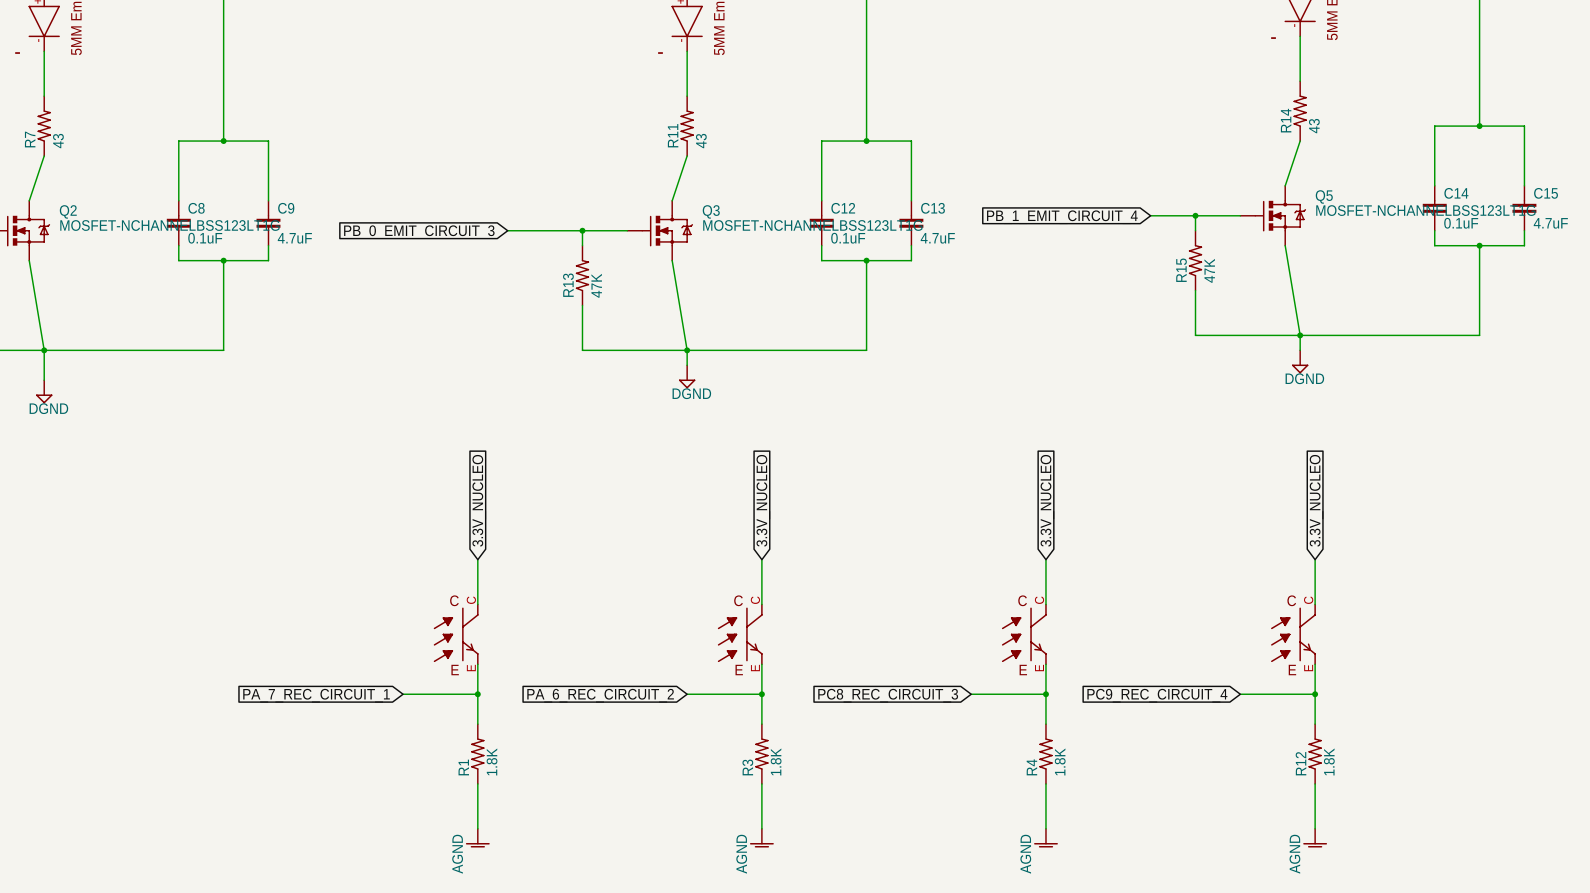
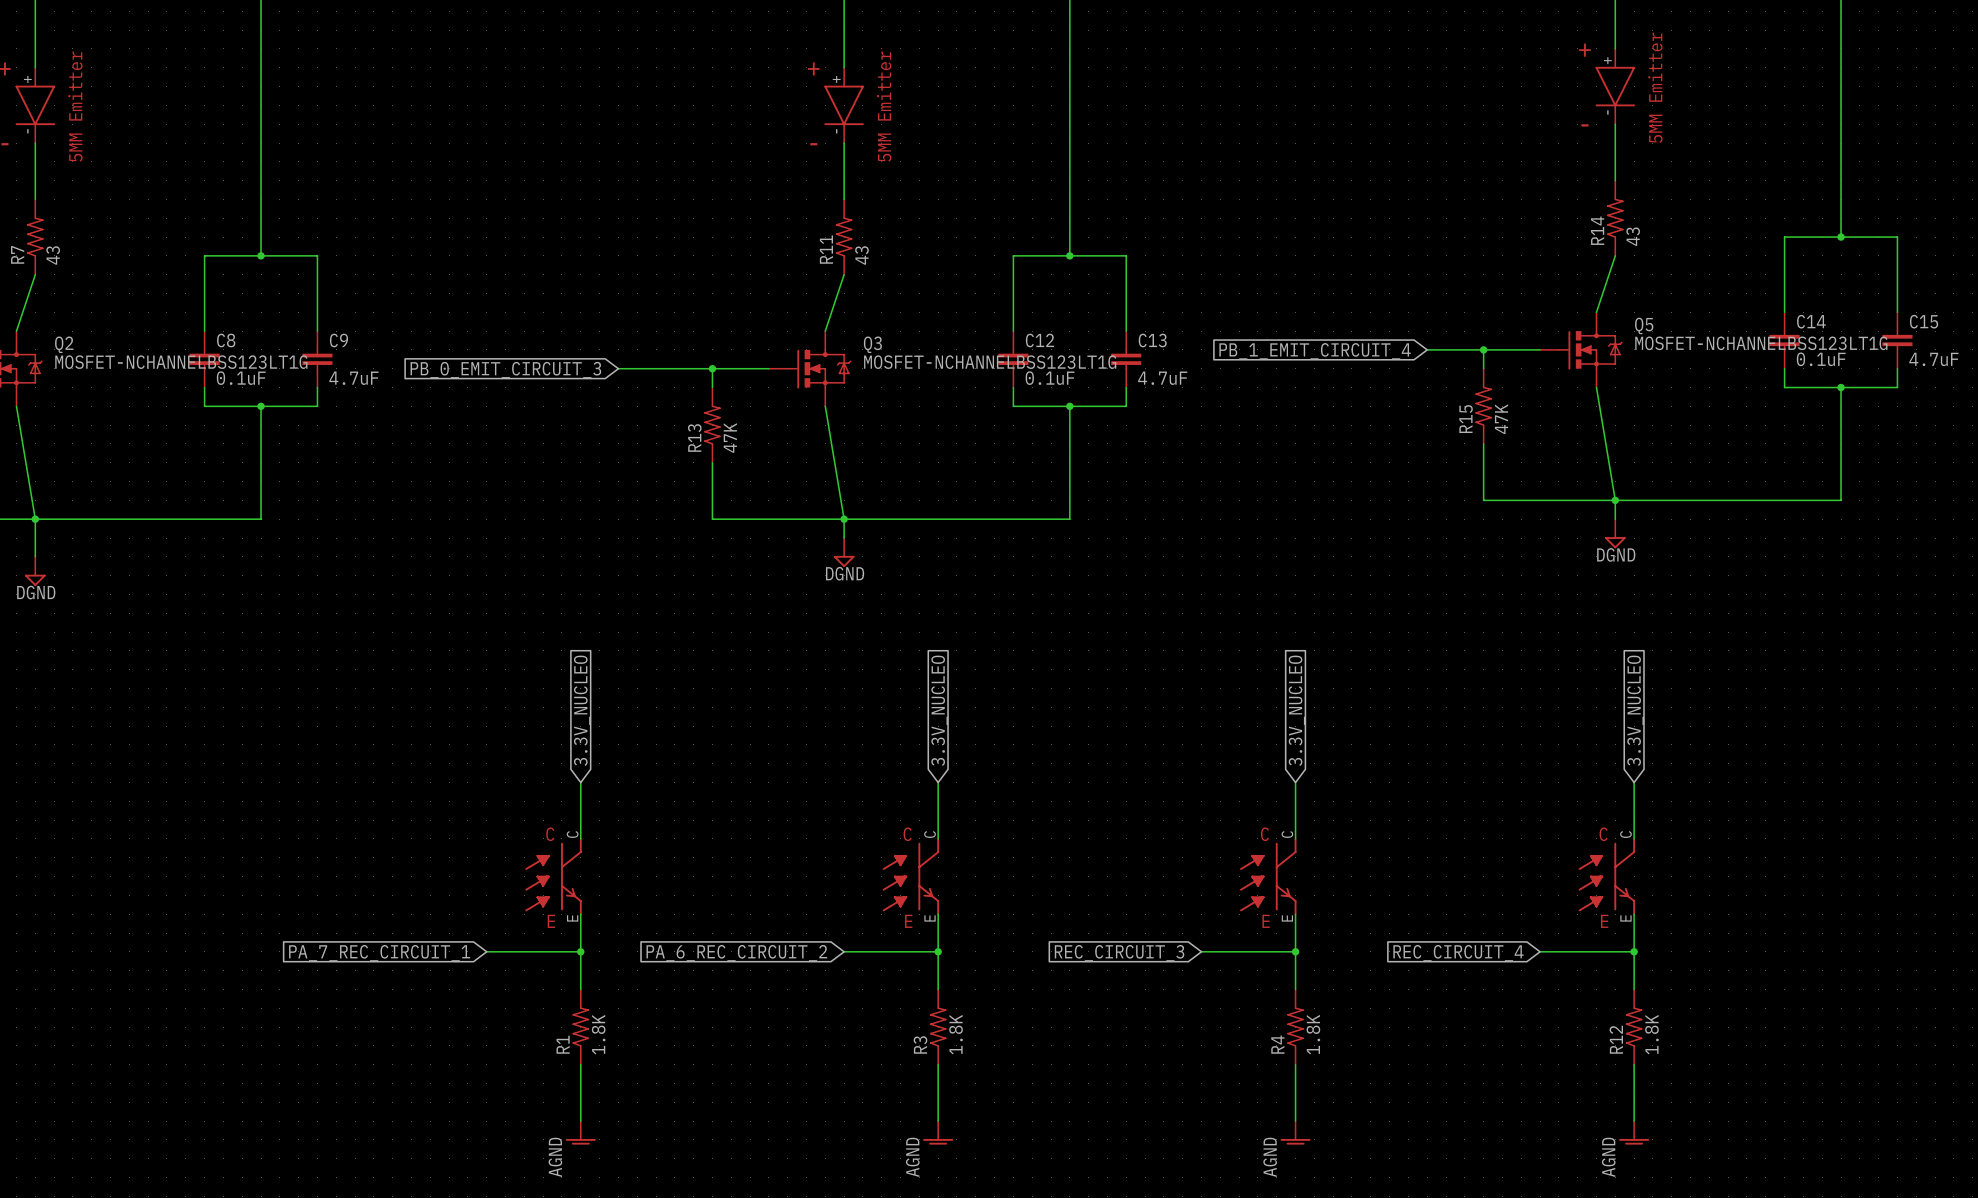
global label: PC8_REC_CIRCUIT_3 (888, 695) -> REC_CIRCUIT_3 (1119, 953)
global label: PC9_REC_CIRCUIT_4 (1157, 695) -> REC_CIRCUIT_4 (1458, 953)

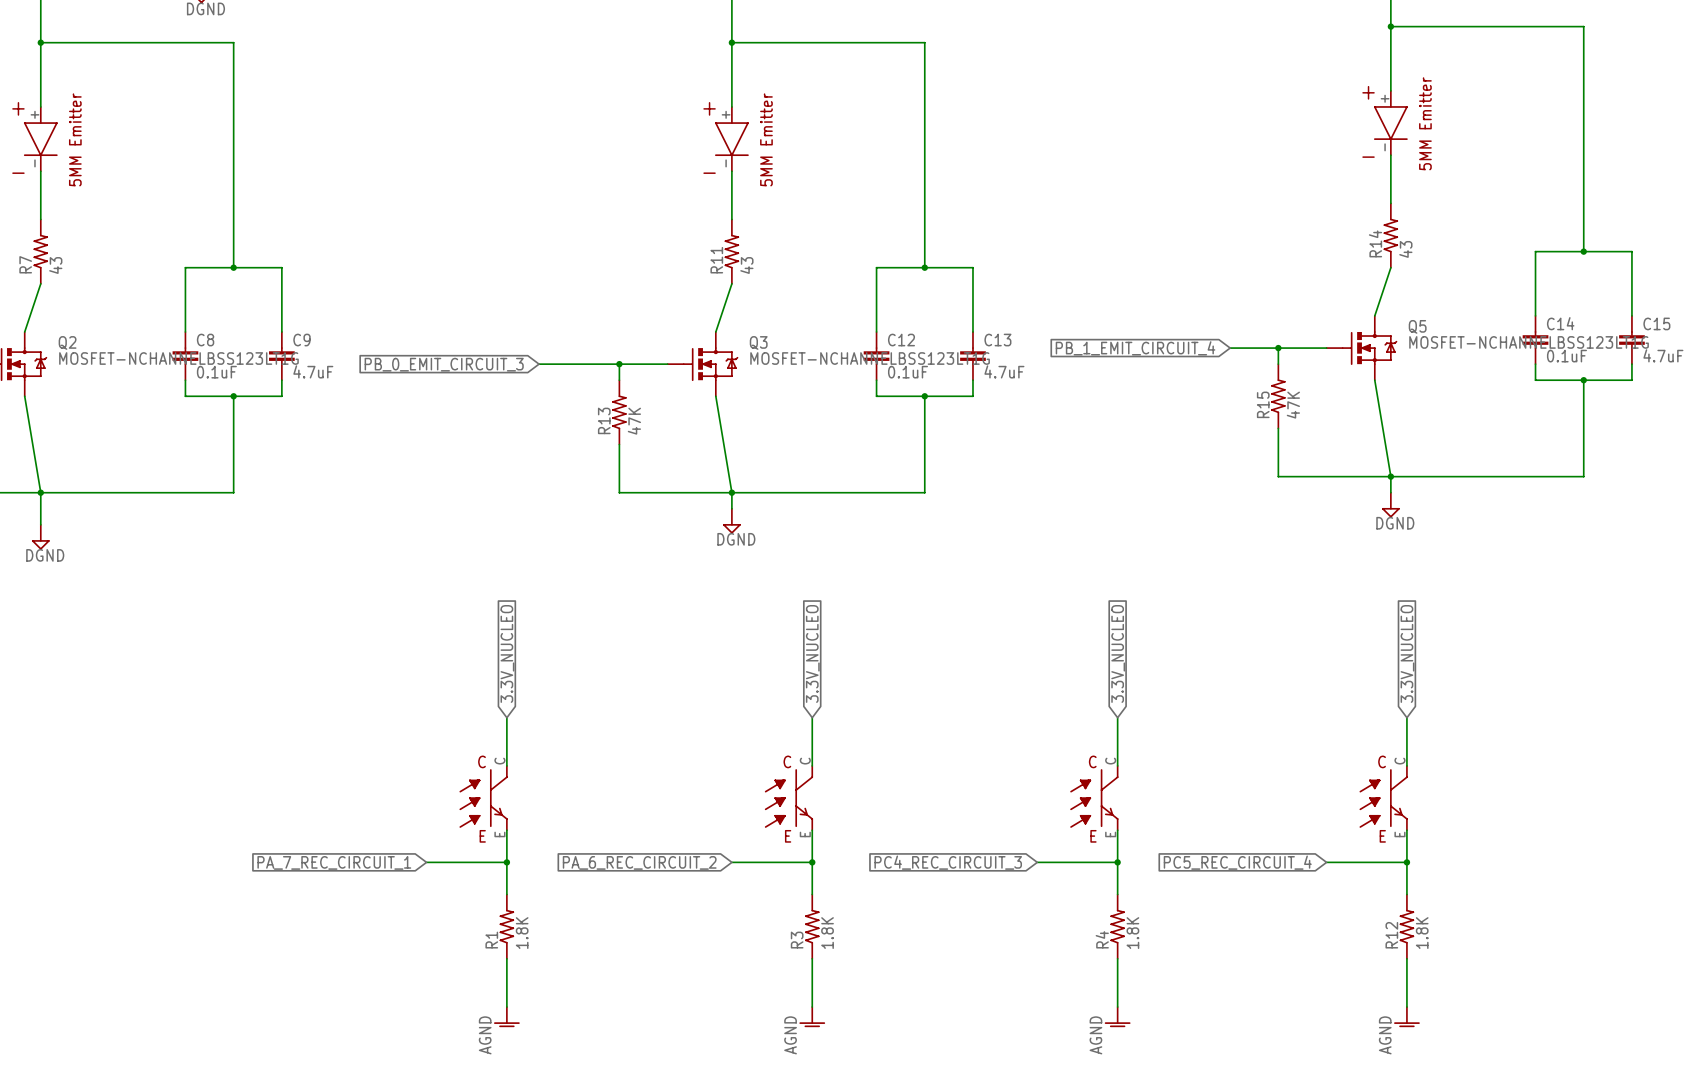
global label: REC_CIRCUIT_3 (1119, 953) -> PC4_REC_CIRCUIT_3 (948, 862)
global label: REC_CIRCUIT_4 (1458, 953) -> PC5_REC_CIRCUIT_4 (1237, 862)

